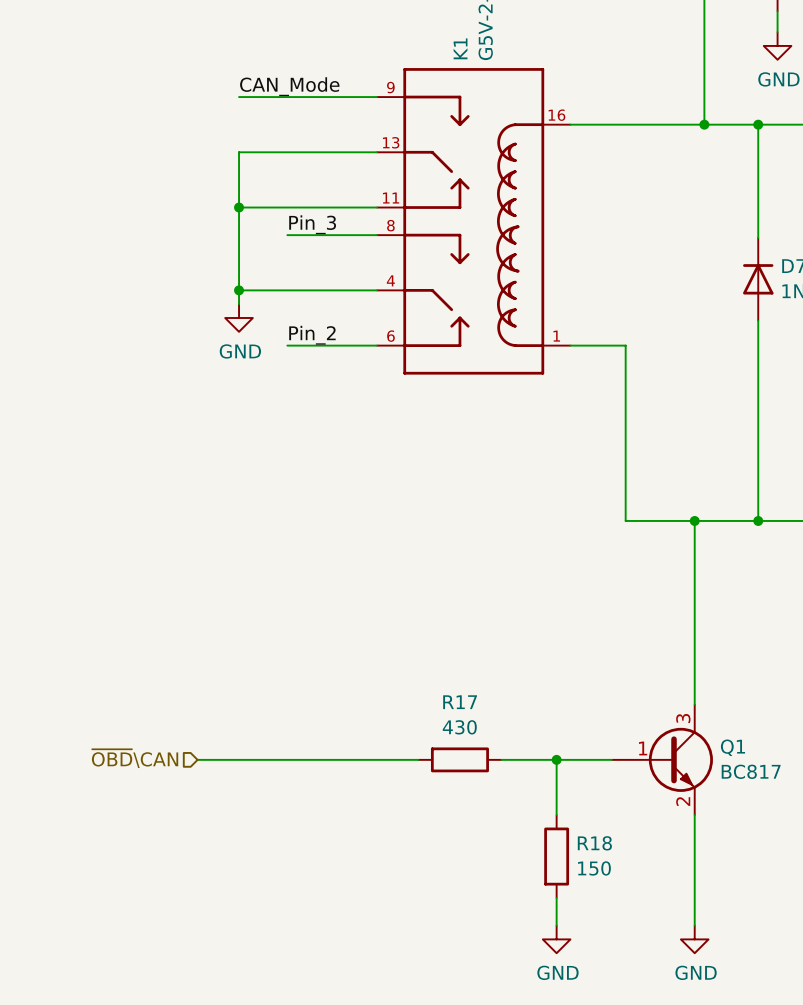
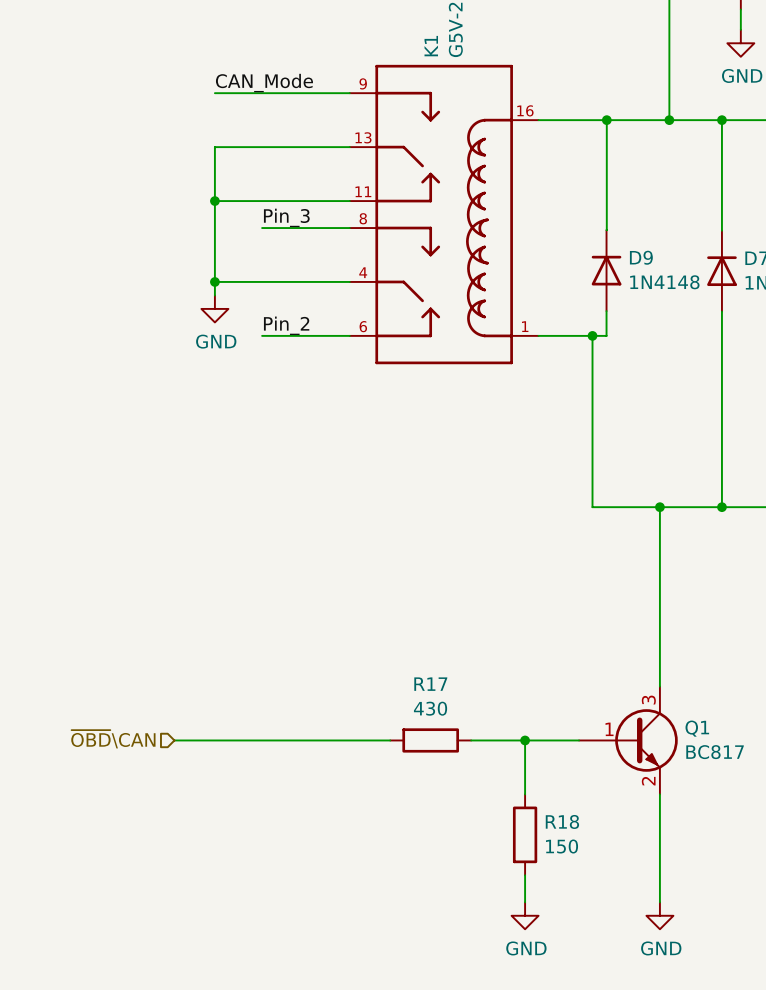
wire: none -> (606, 120) (606, 230)
junction: none -> (606, 120)
D9: none -> 1N4148 (606, 270)
wire: none -> (606, 311) (606, 335) (592, 335)
junction: none -> (592, 335)

